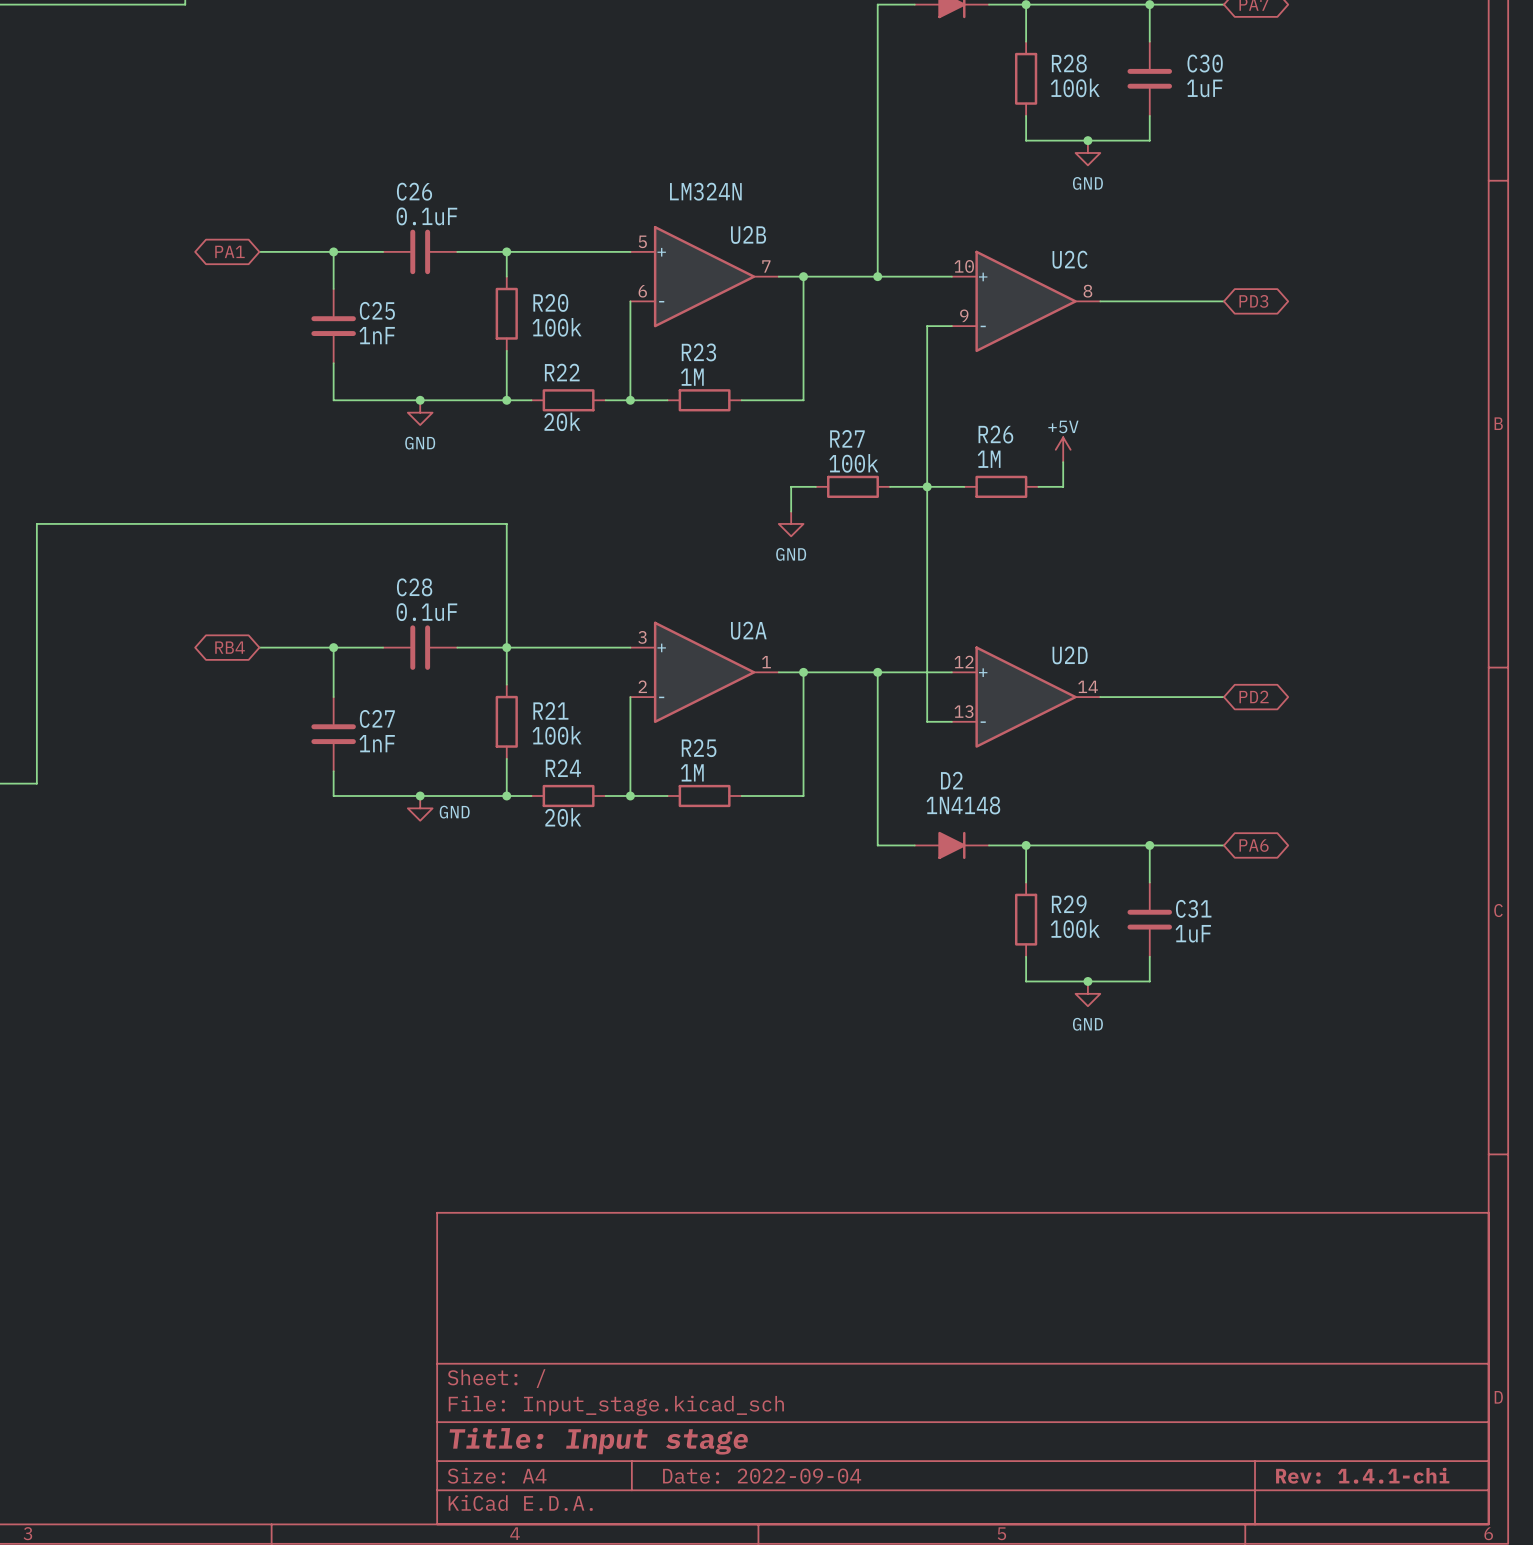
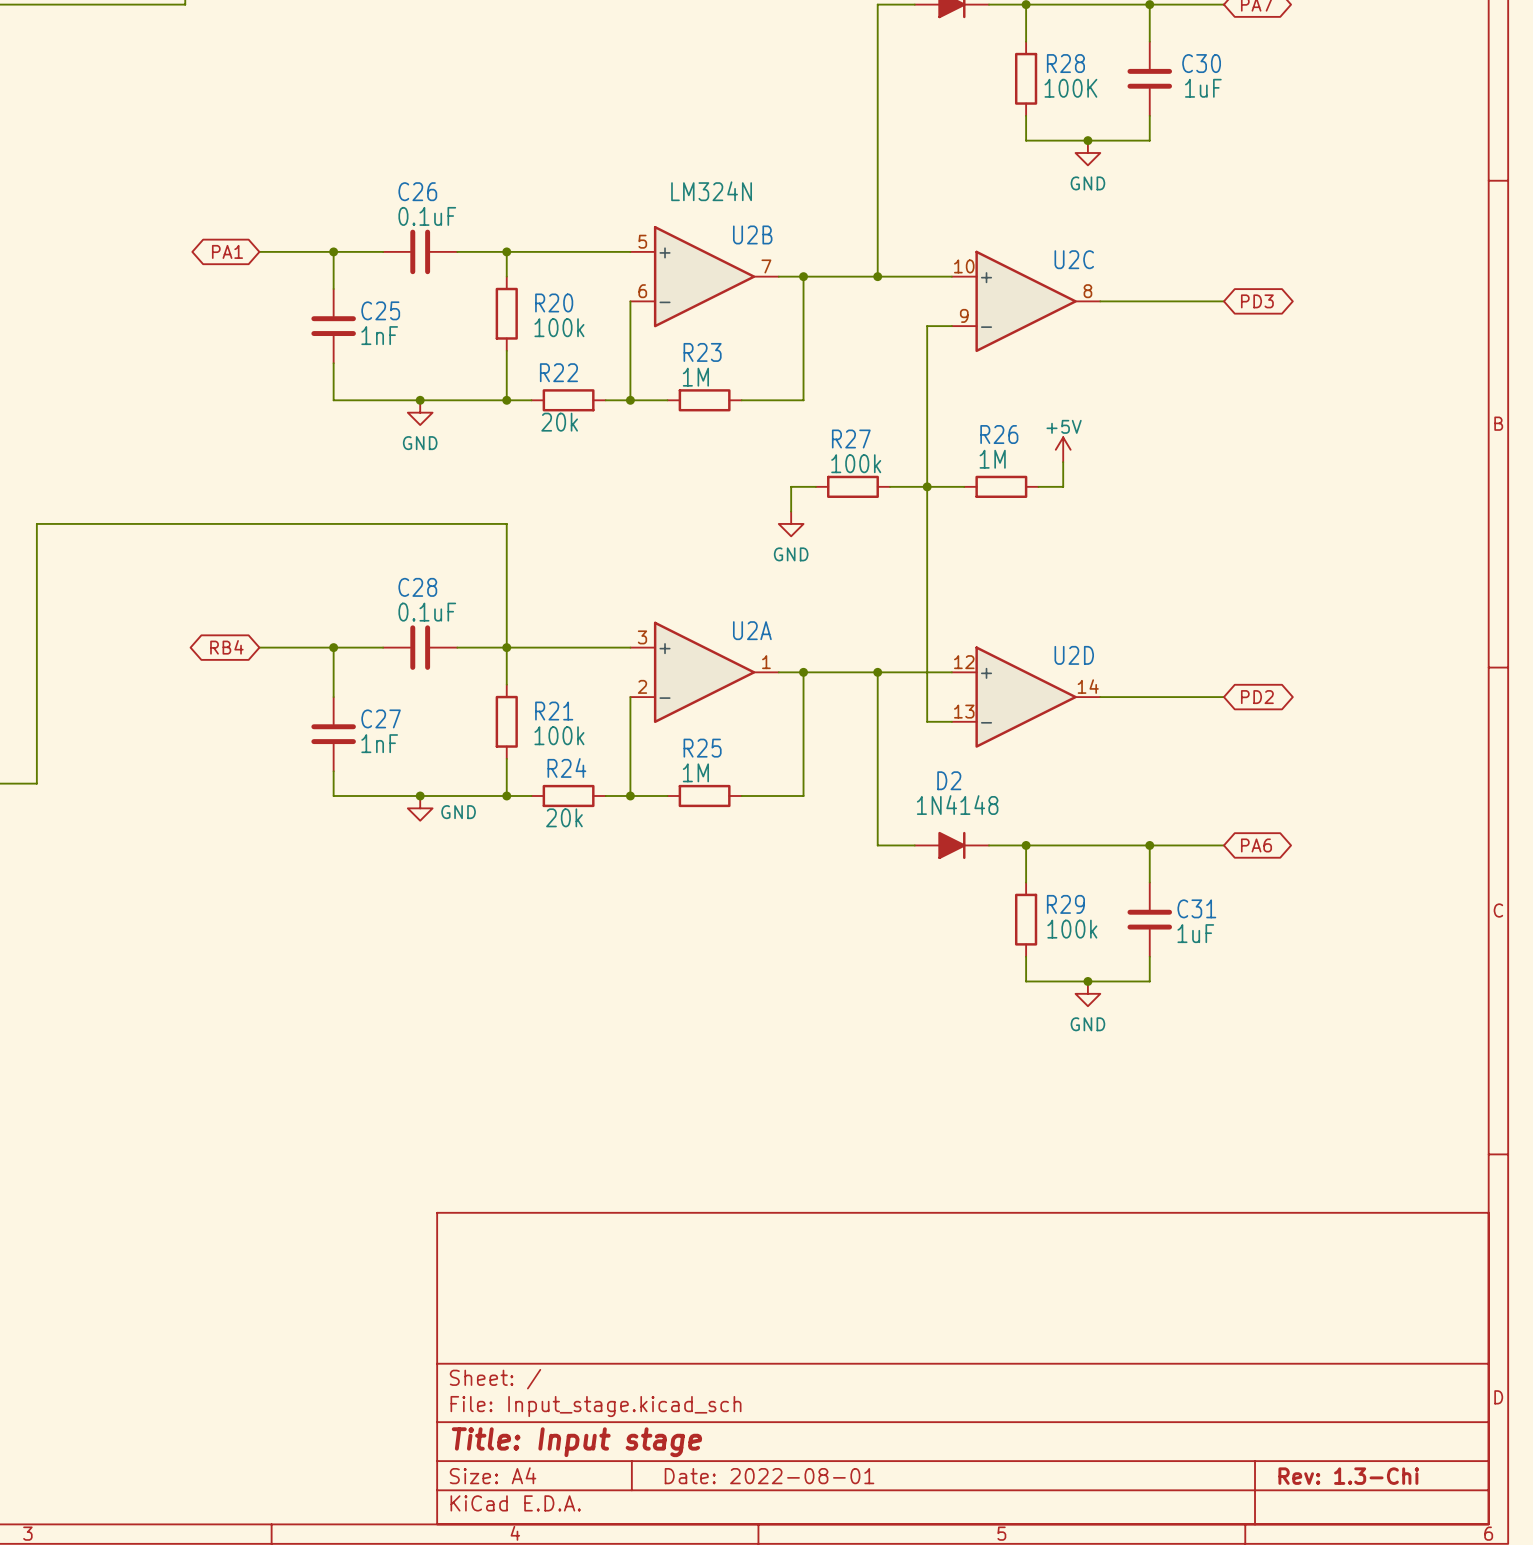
R28 value: 100k (1075, 87) -> 100K (1070, 88)
title block: Rev: 1.4.1-chi (1362, 1475) -> Rev: 1.3-Chi (1348, 1476)
title block: Date: 2022-09-04 (762, 1476) -> Date: 2022-08-01 (769, 1476)

